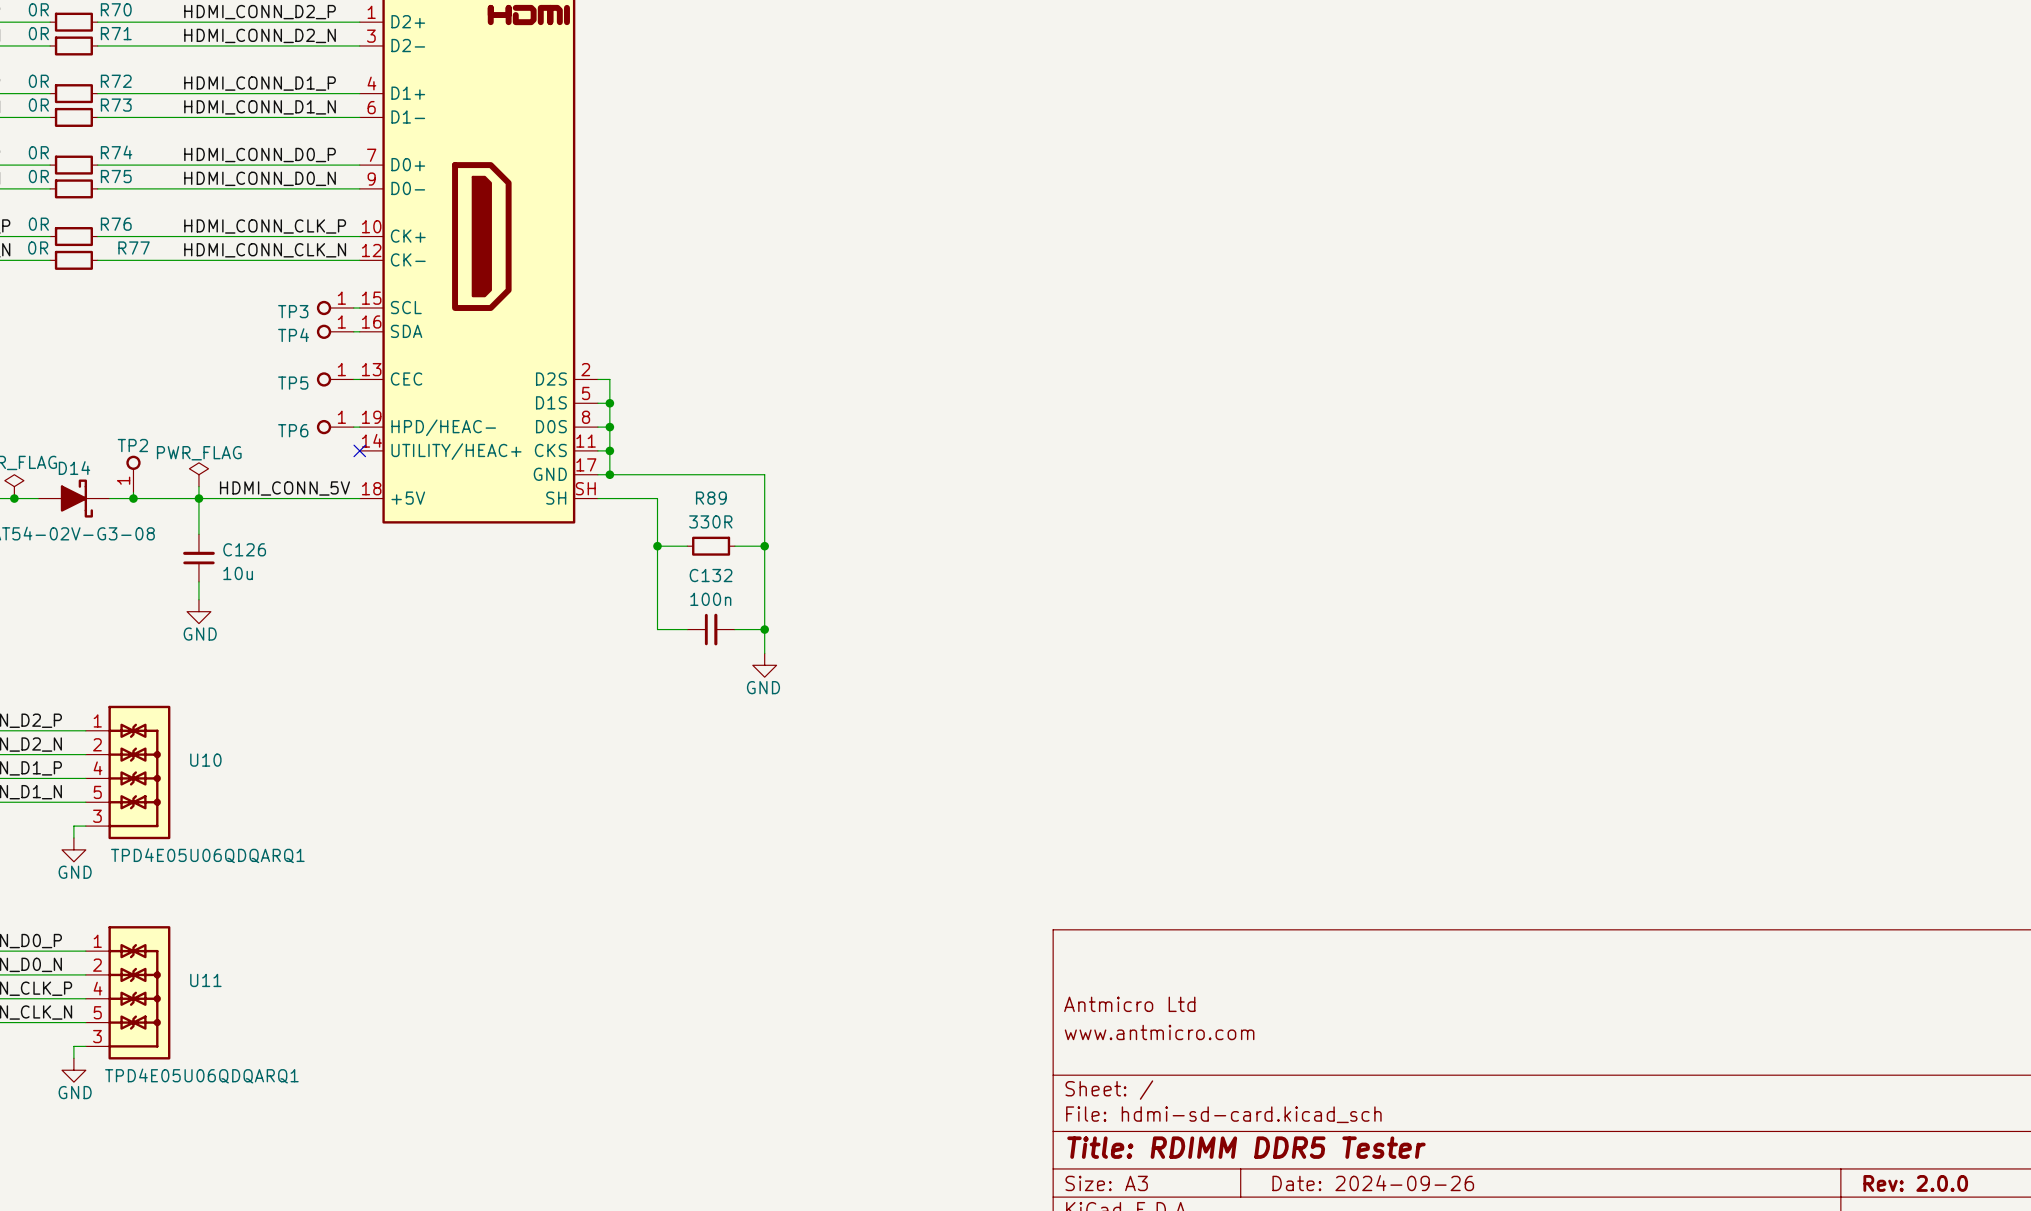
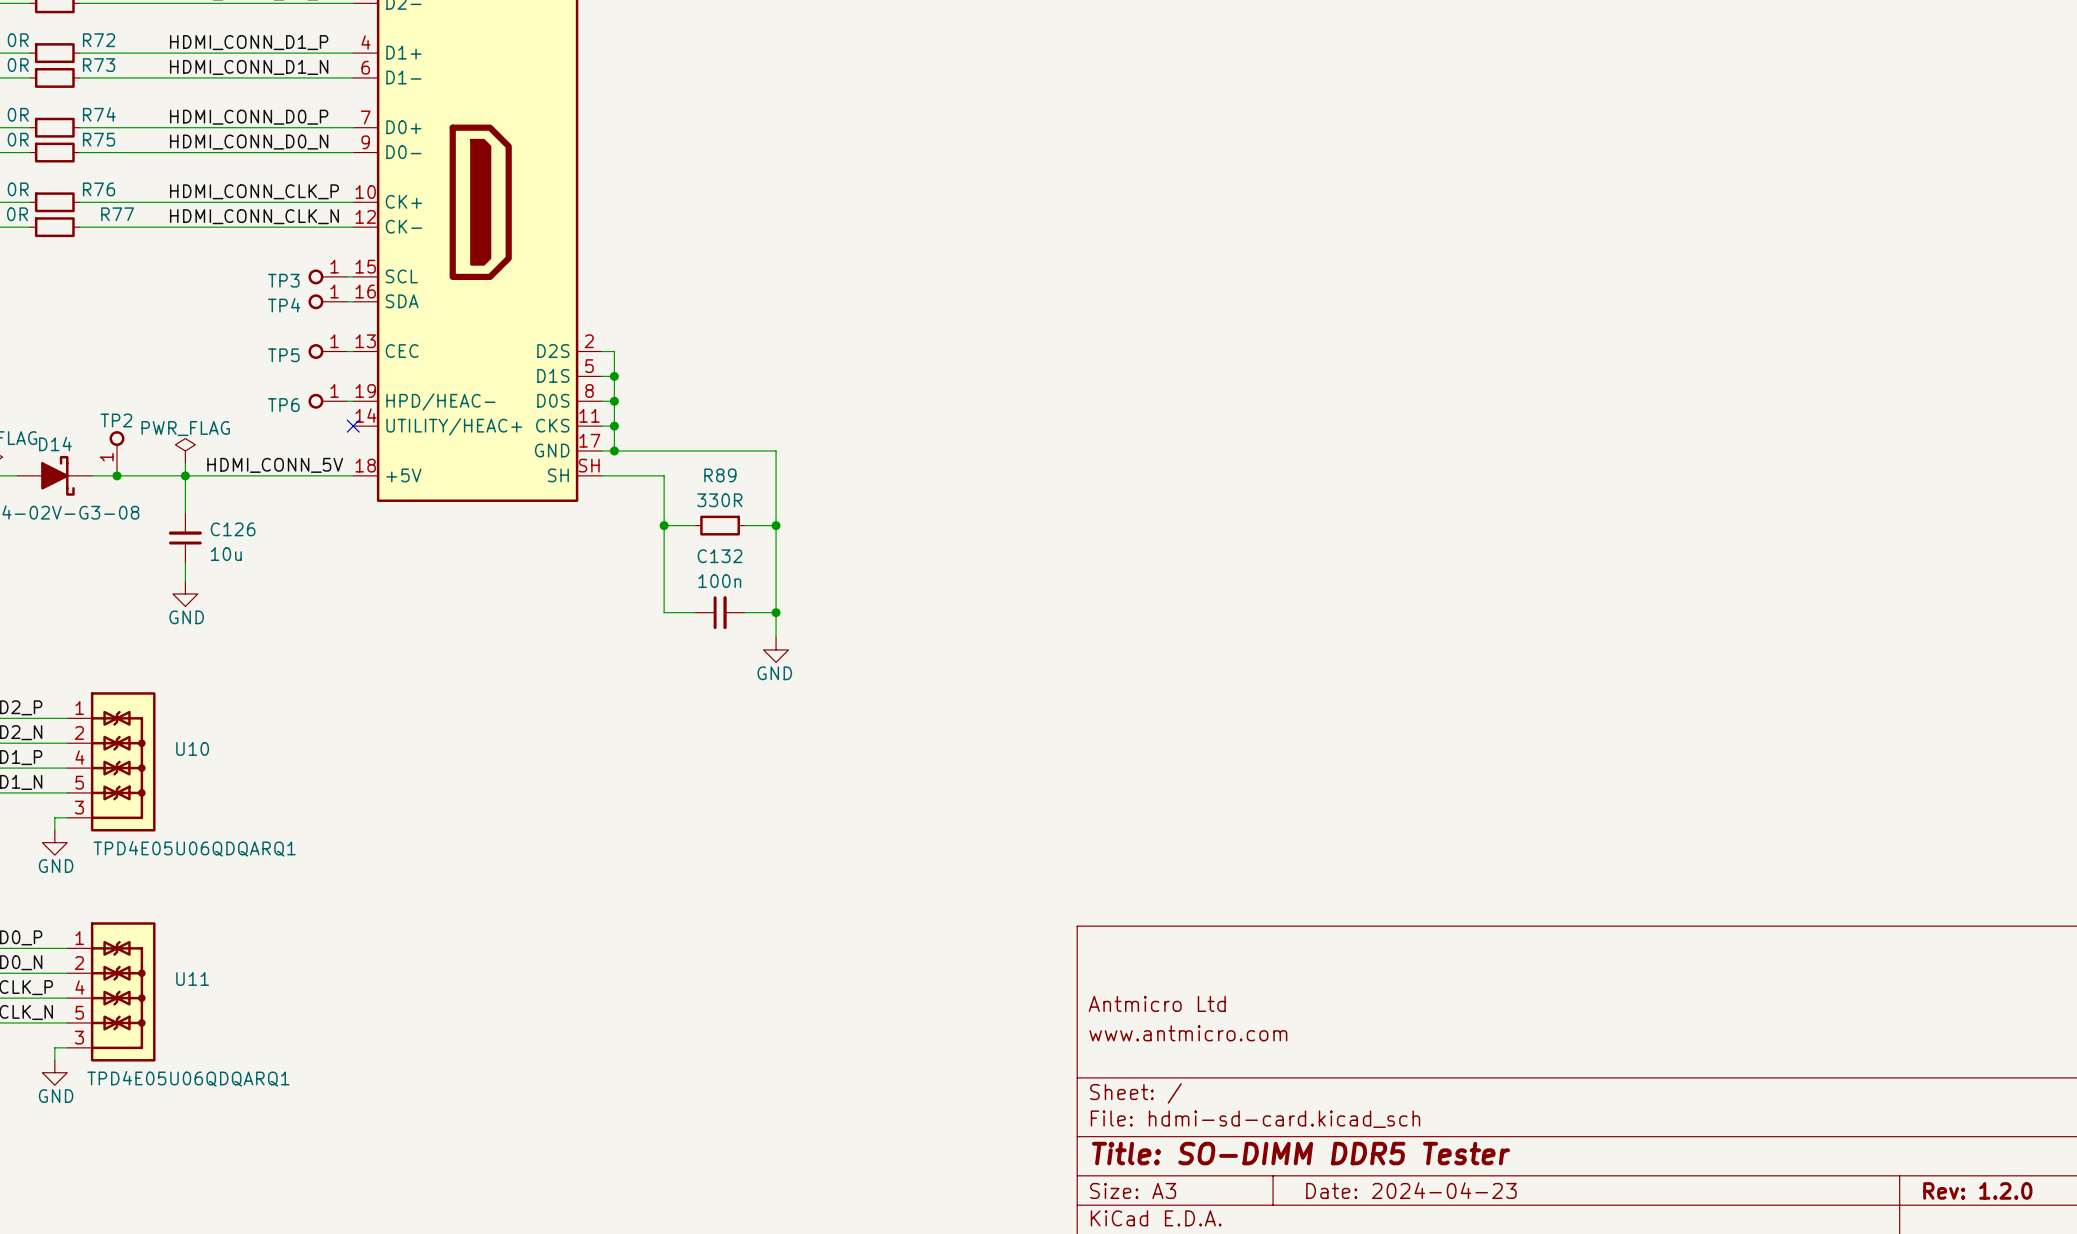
title block: Title: RDIMM DDR5 Tester (1246, 1147) -> Title: SO-DIMM DDR5 Tester (1300, 1153)
title block: Date: 2024-09-26 (1373, 1183) -> Date: 2024-04-23 (1411, 1190)
title block: Rev: 2.0.0 (1915, 1183) -> Rev: 1.2.0 (1977, 1190)

